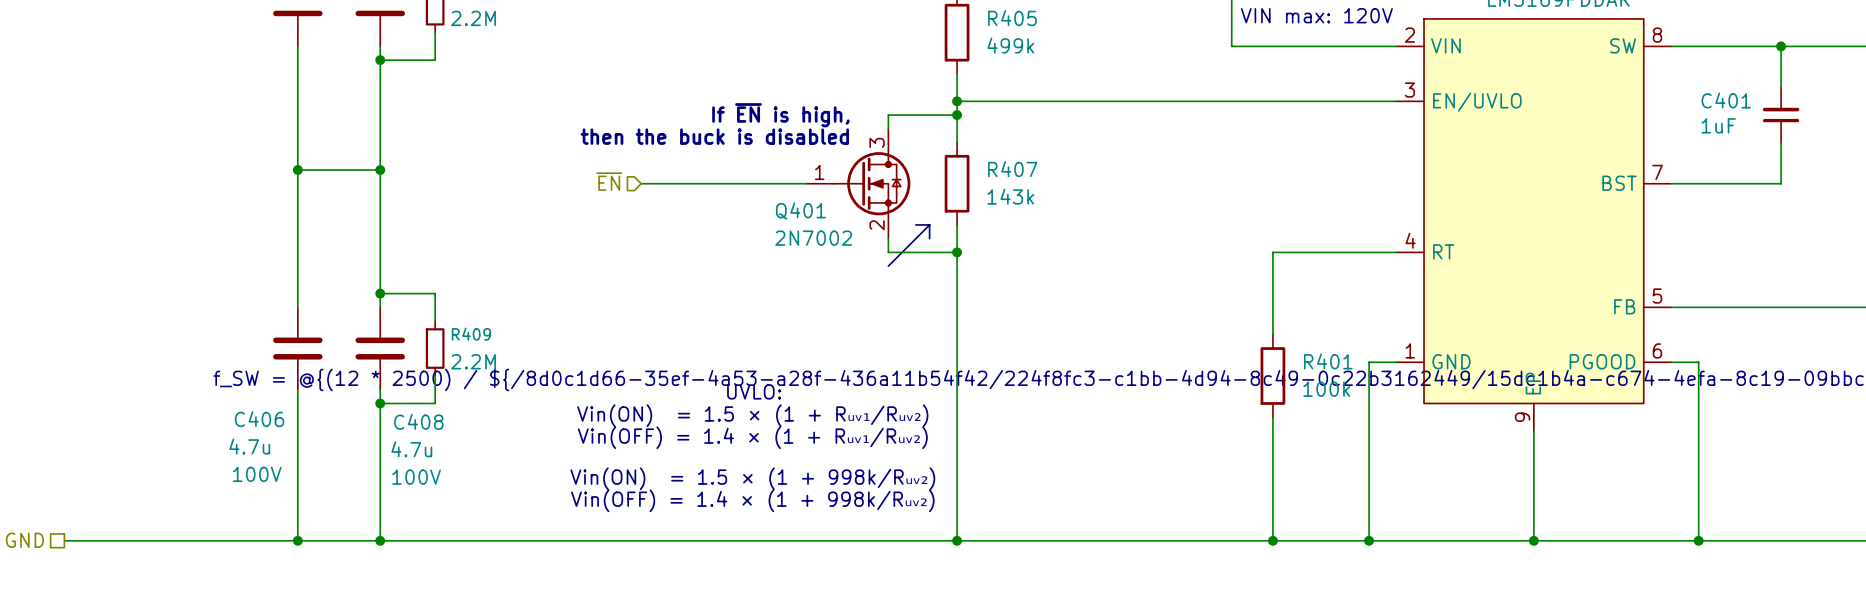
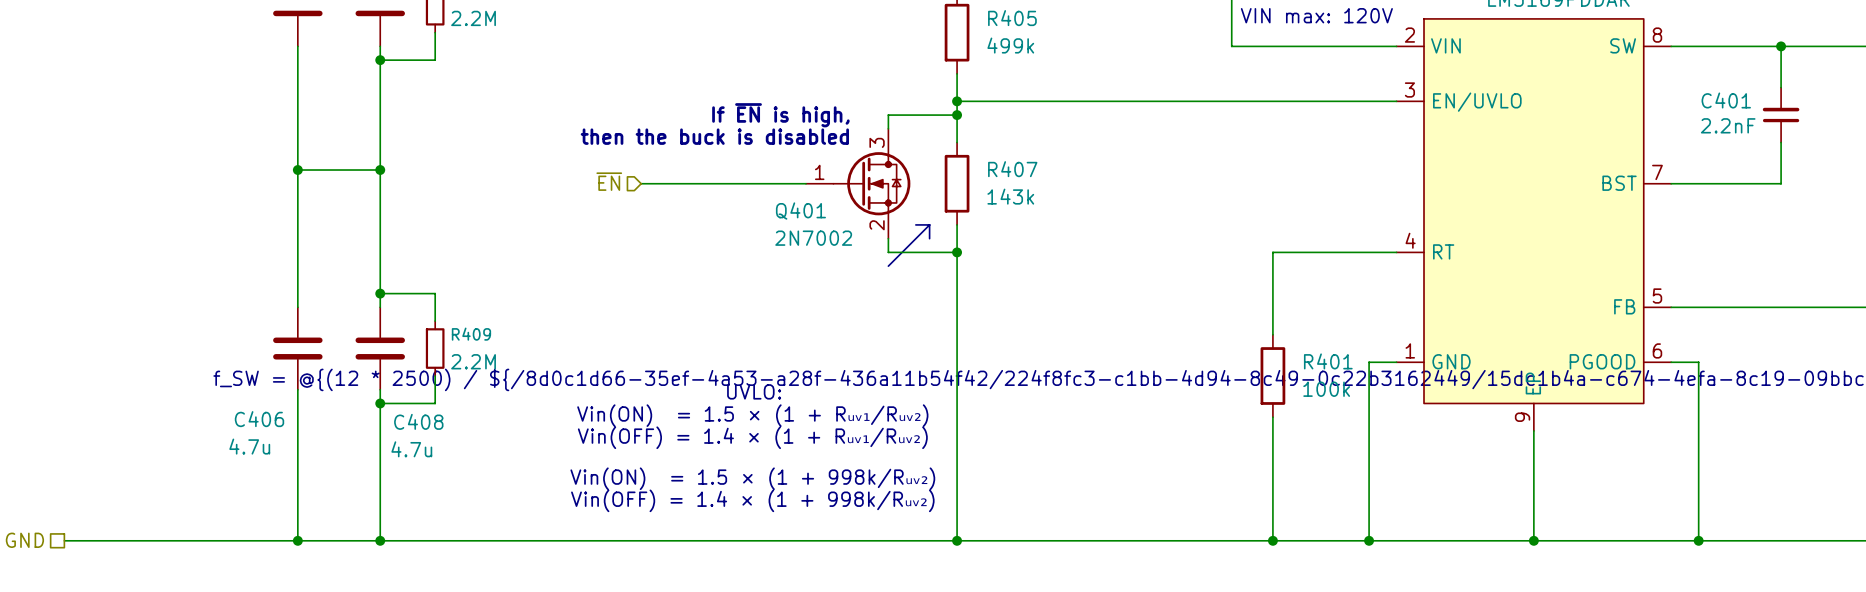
C401 value: 1uF (1718, 125) -> 2.2nF (1728, 125)
C406 text: 100V (257, 474) -> none
C408 text: 100V (416, 477) -> none

